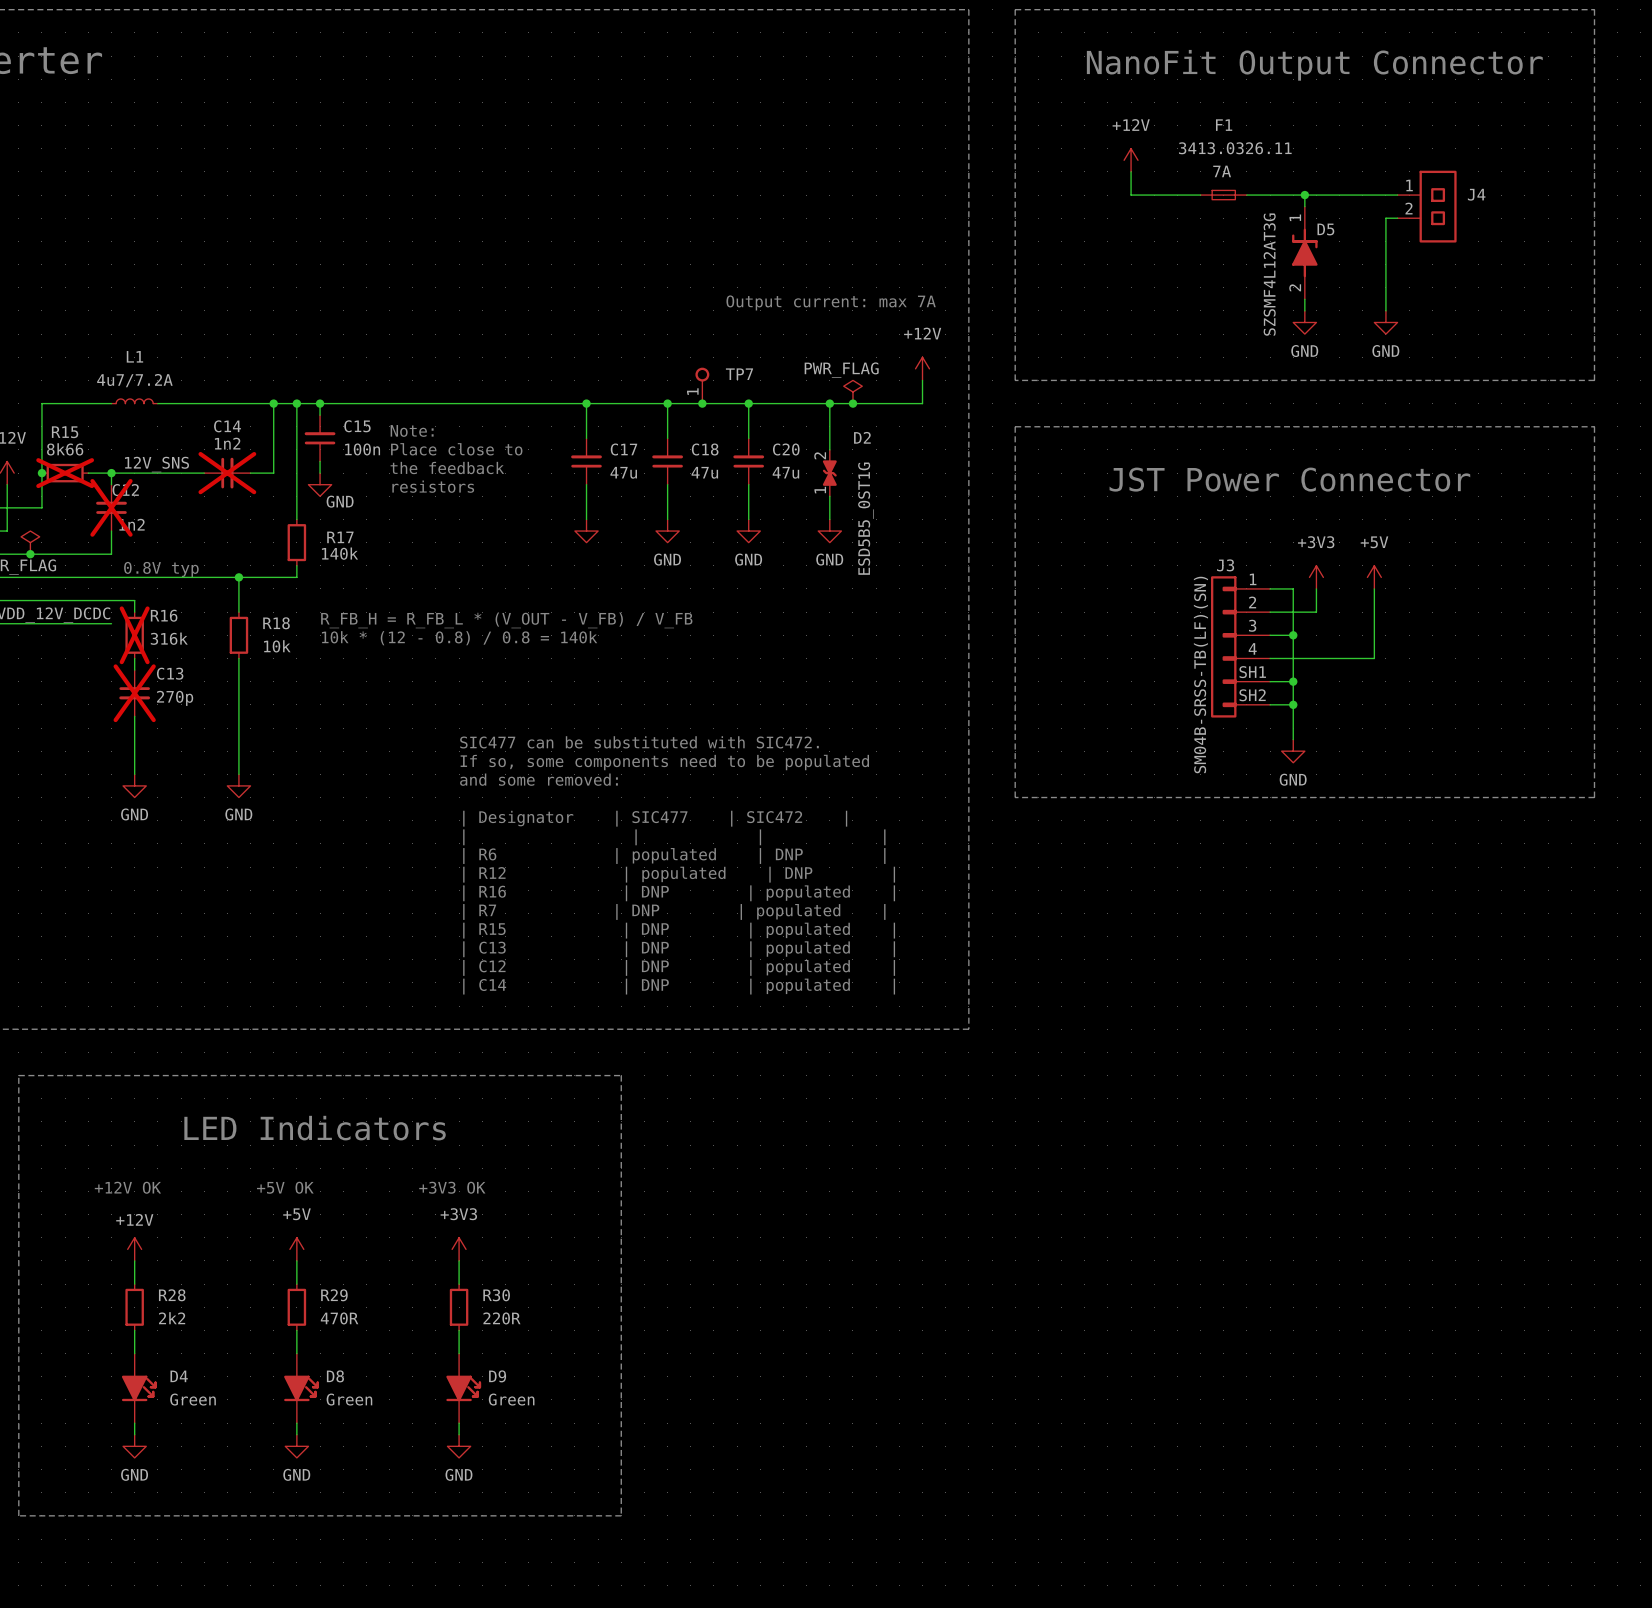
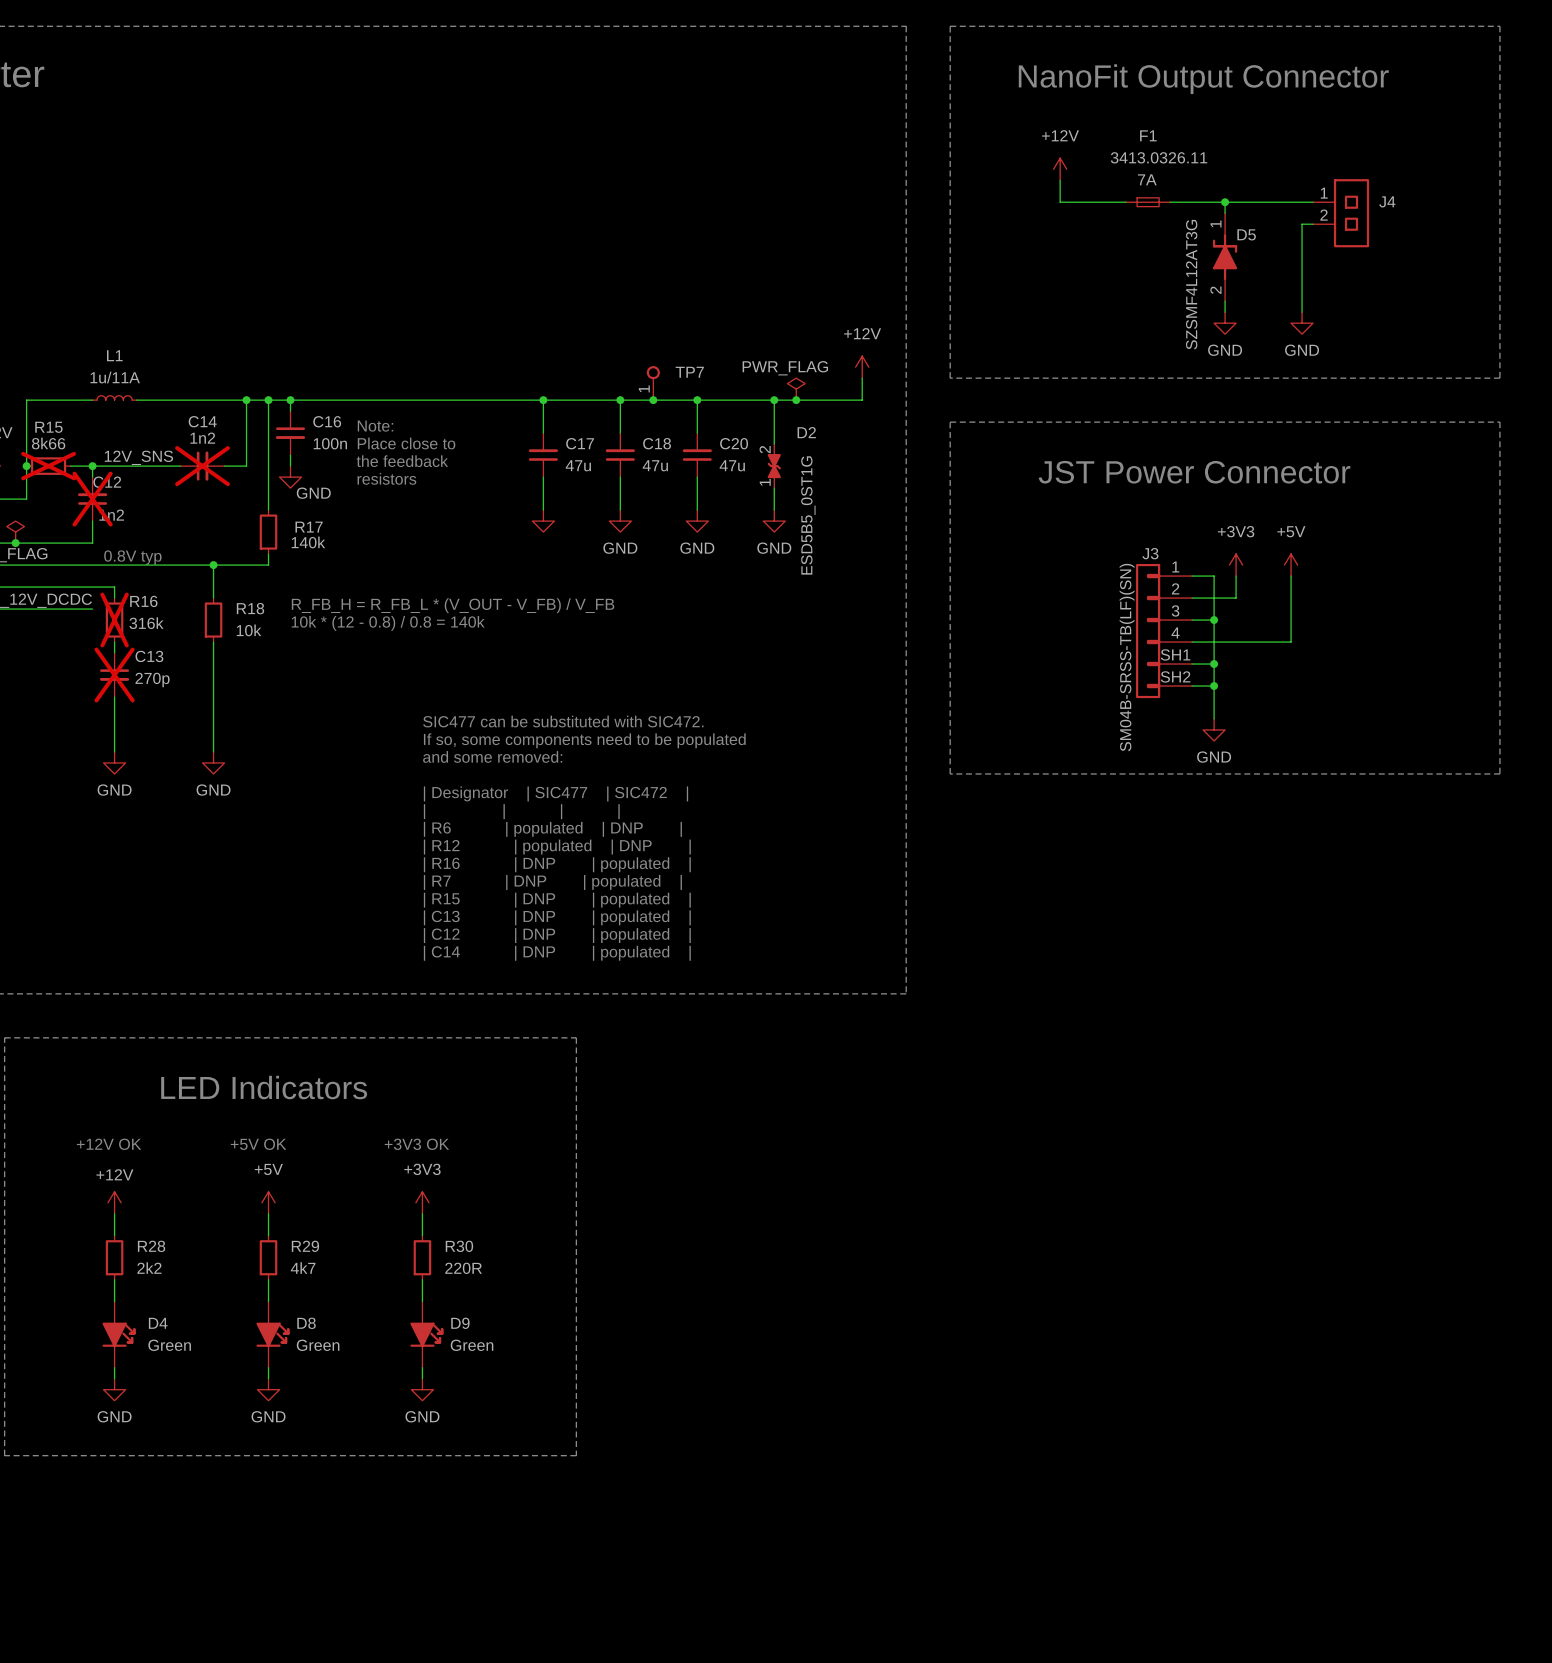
text: Output current: max 7A (831, 302) -> none
L1 text: 4u7/7.2A (134, 380) -> 1u/11A (115, 377)
C15: (320, 438) -> none
C16: none -> (290, 433)
R29 text: 470R (339, 1318) -> 4k7 (303, 1268)

